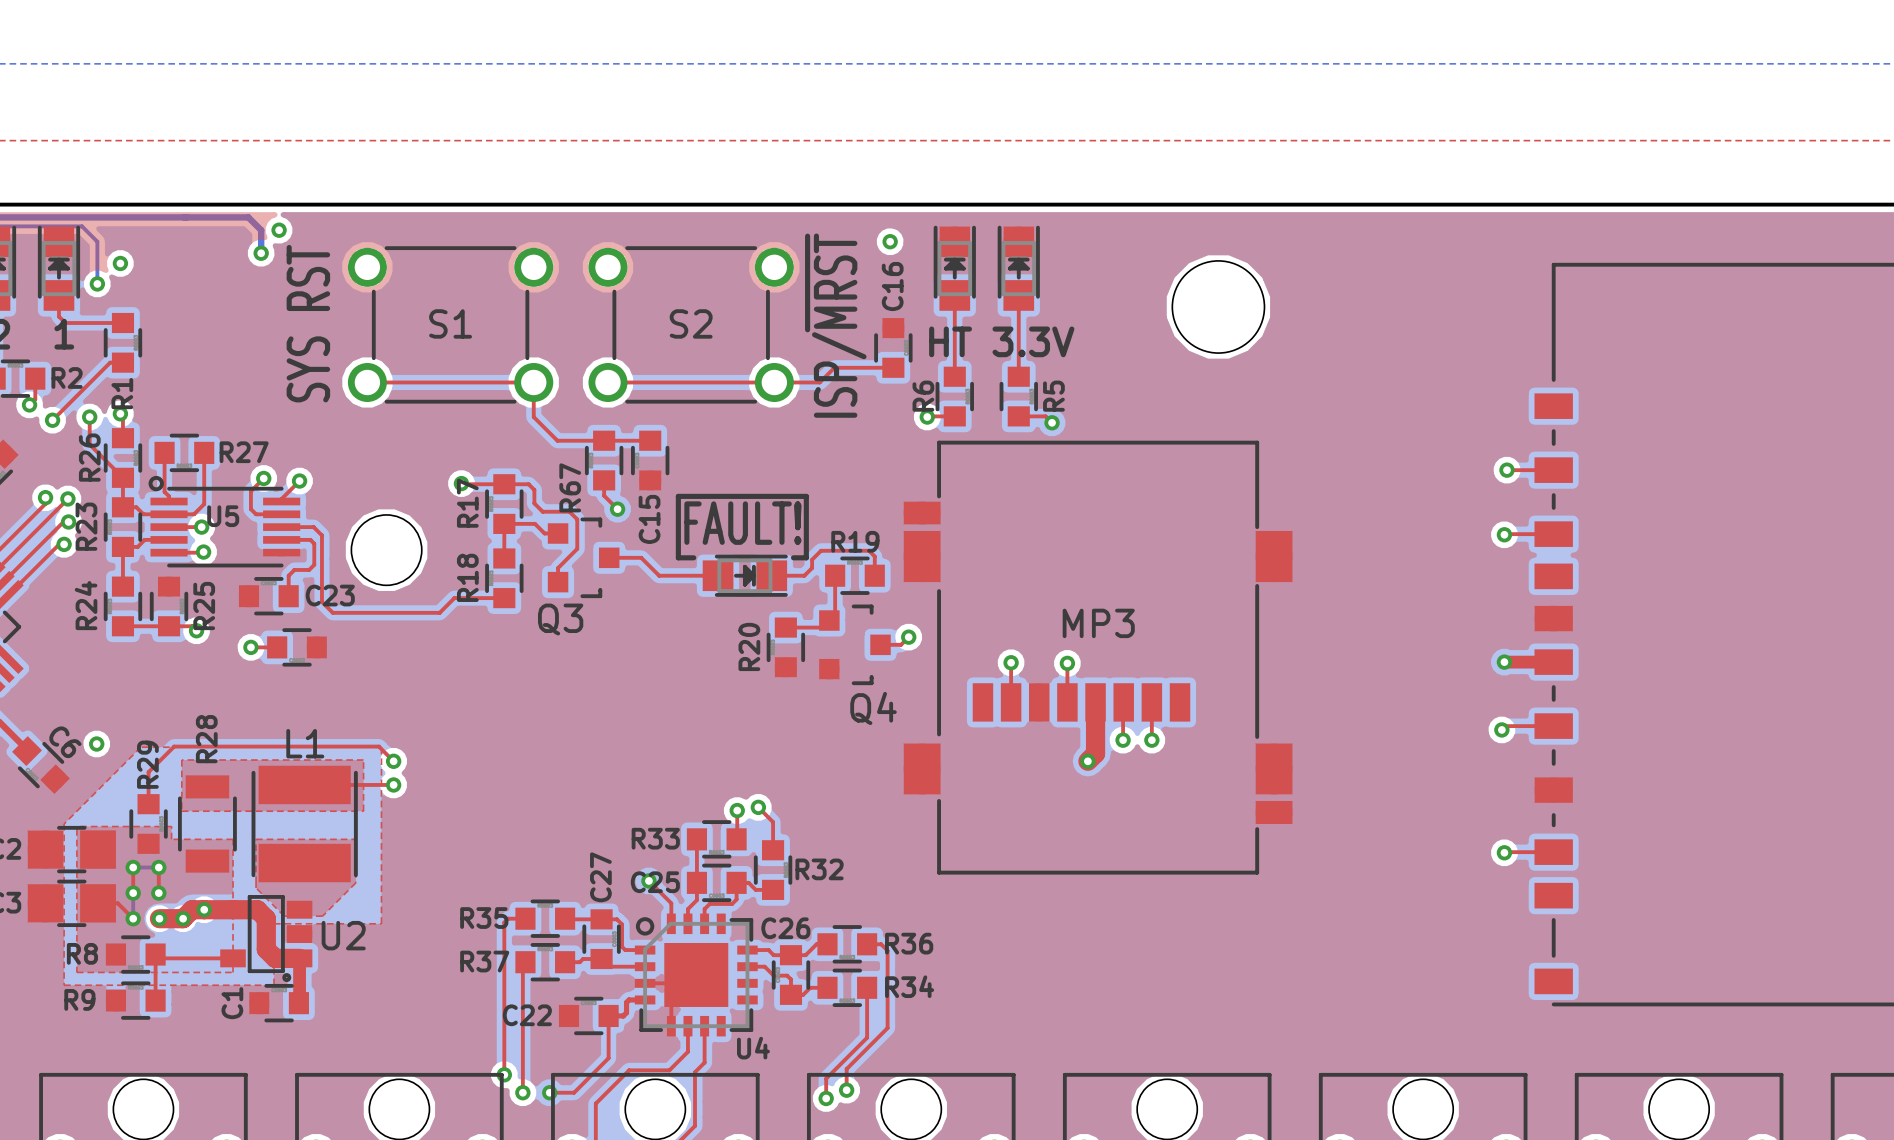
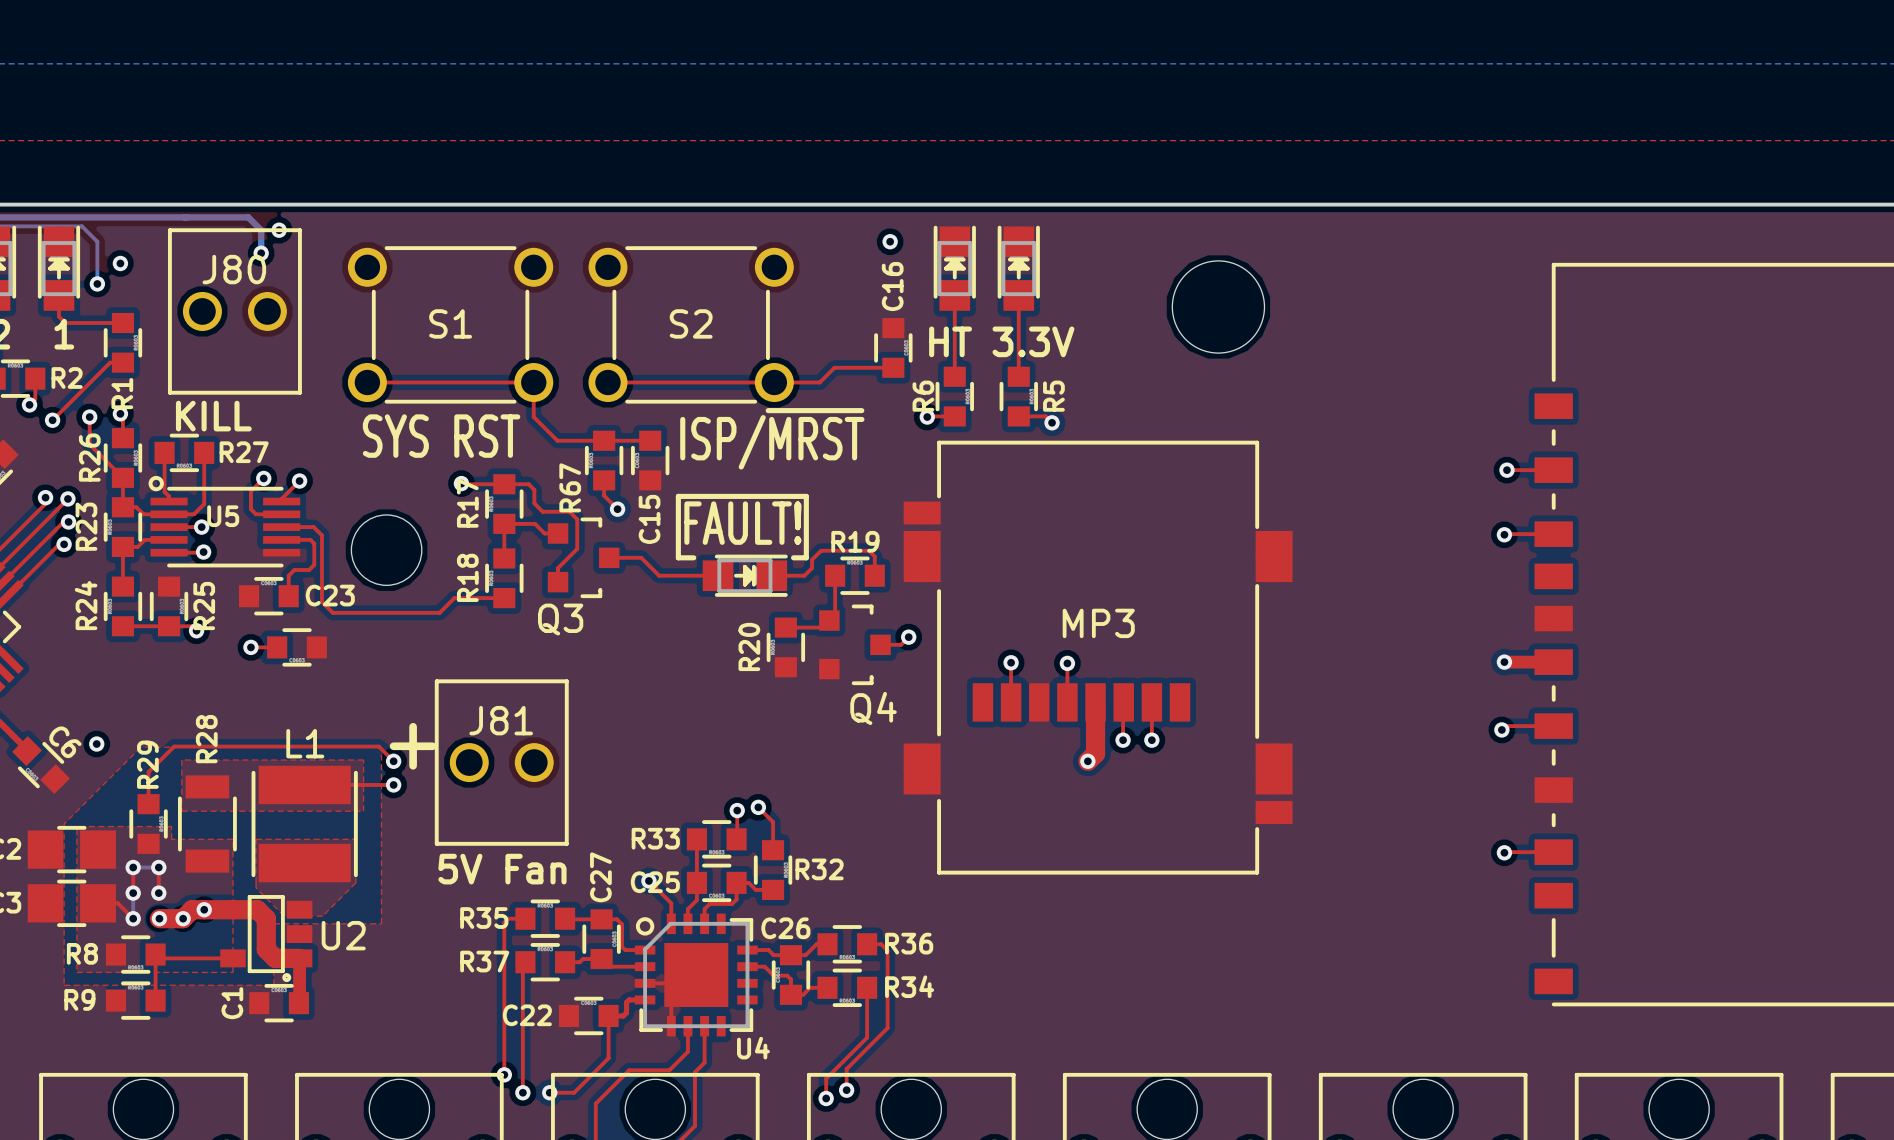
J80: none -> (234, 311)
text rotation: 0° (308, 323) -> 90° clockwise (441, 436)
text rotation: 0° (835, 325) -> 90° clockwise (772, 438)
text: none -> KILL (213, 416)
text: none -> + (413, 746)
J81: none -> (501, 762)
text: none -> 5V Fan (502, 869)

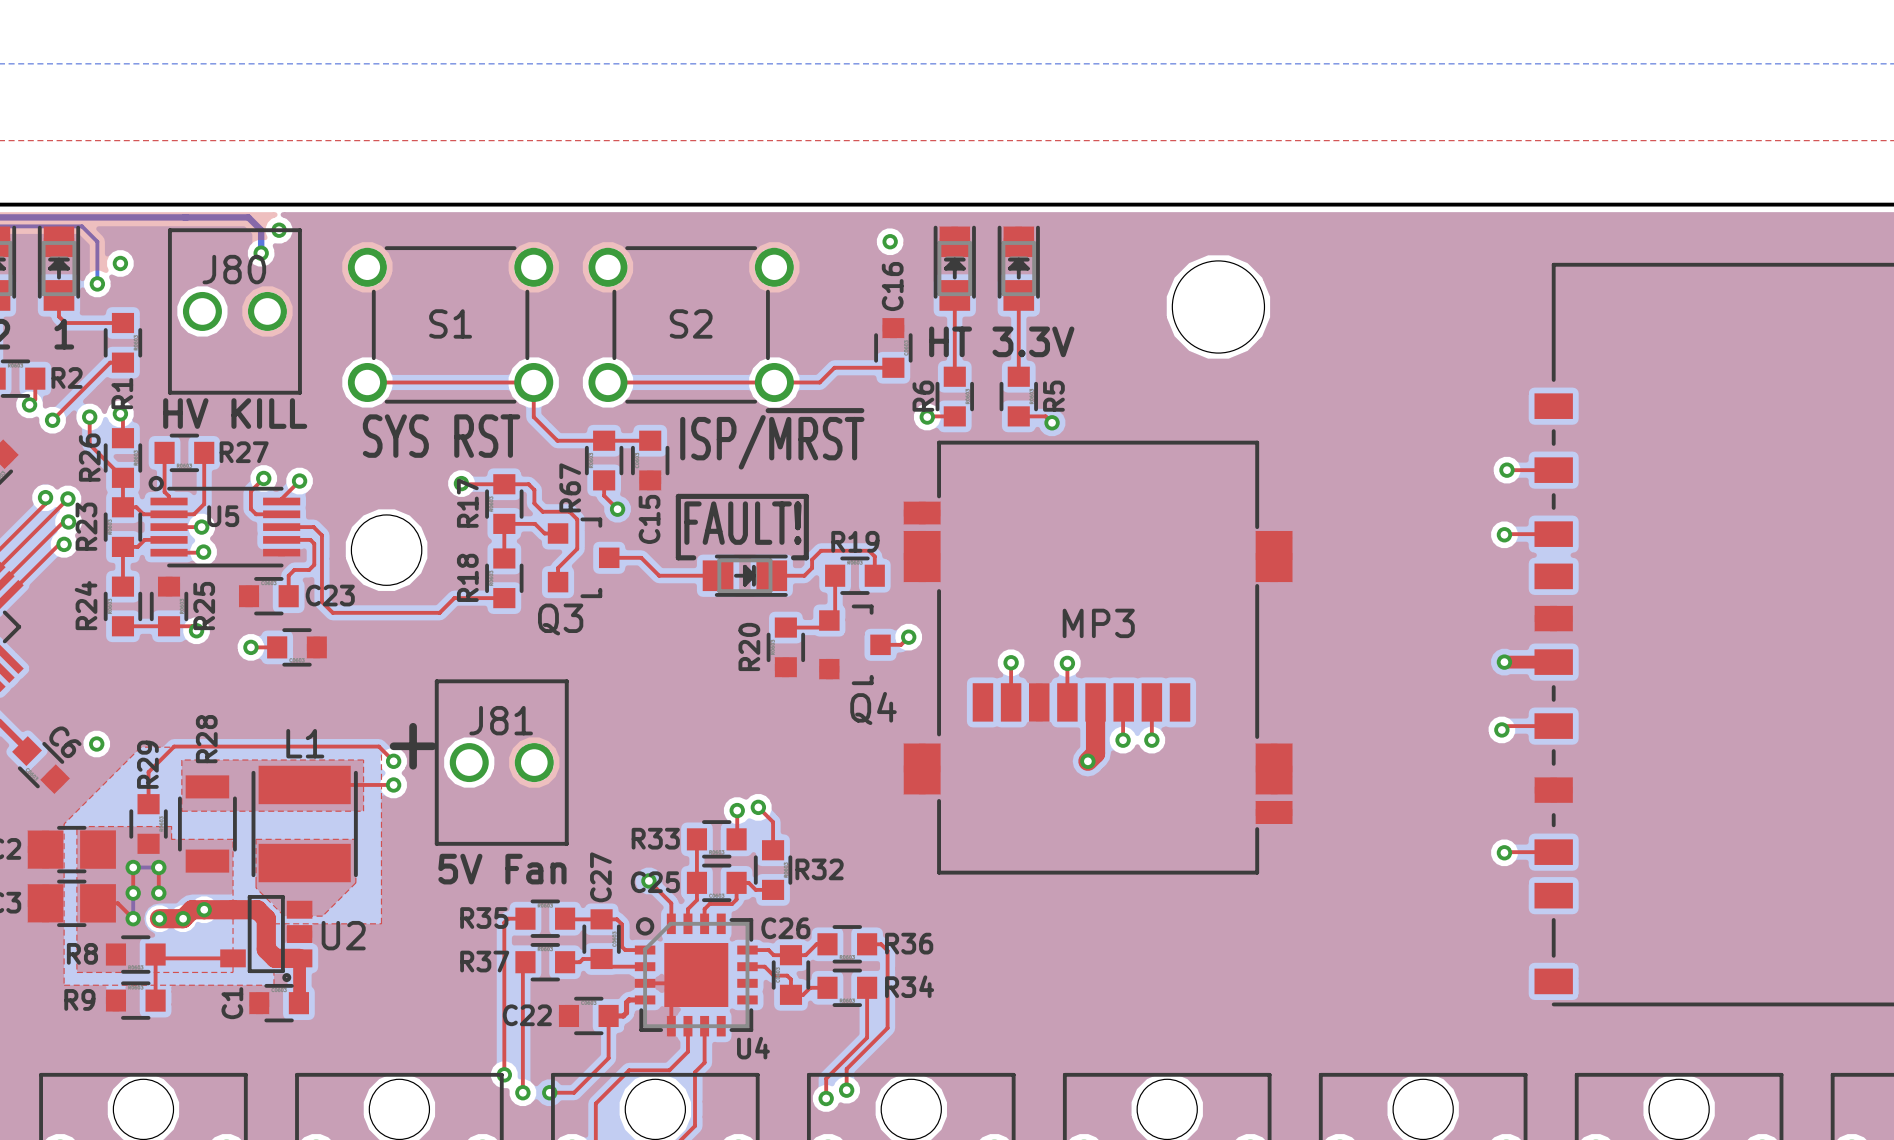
text: KILL (213, 416) -> HV KILL (235, 413)

